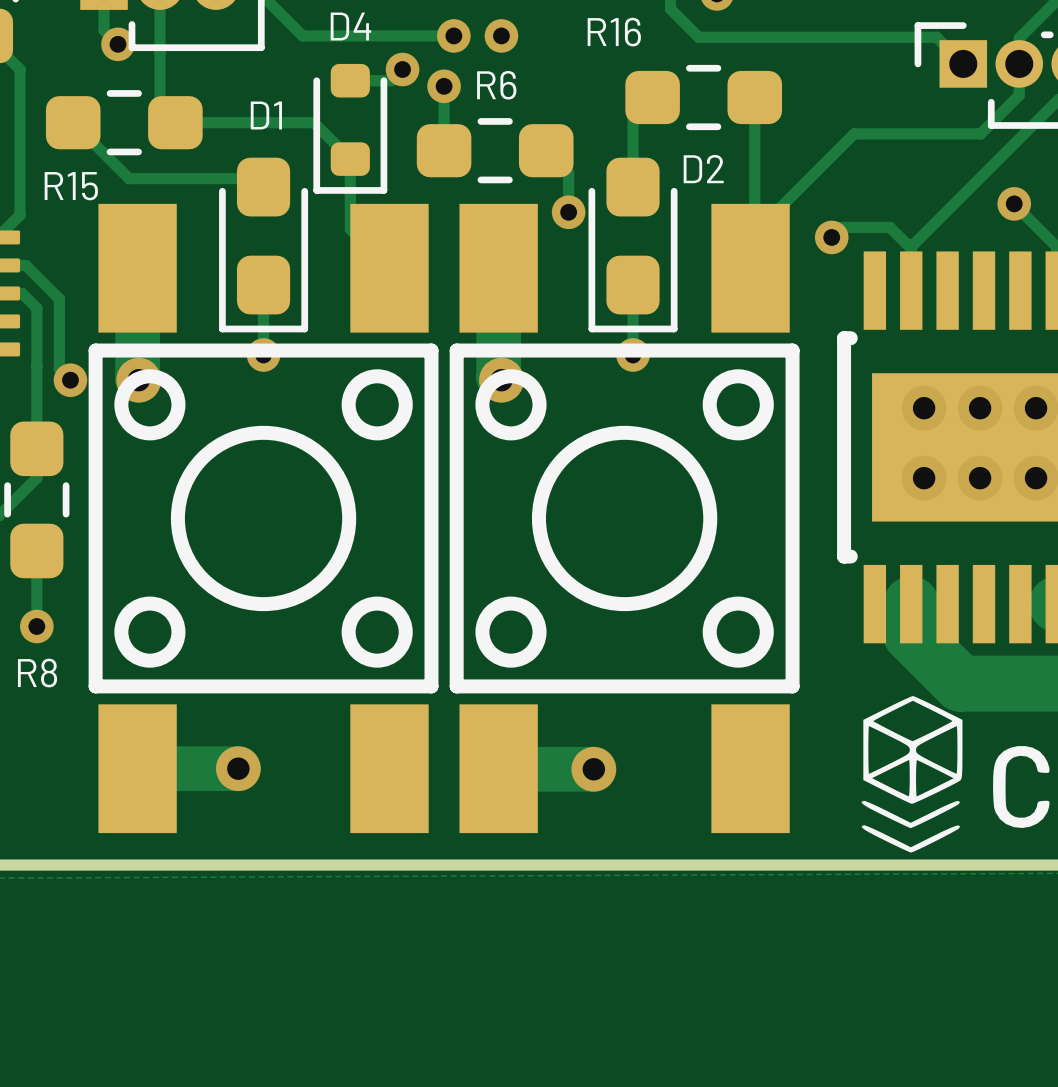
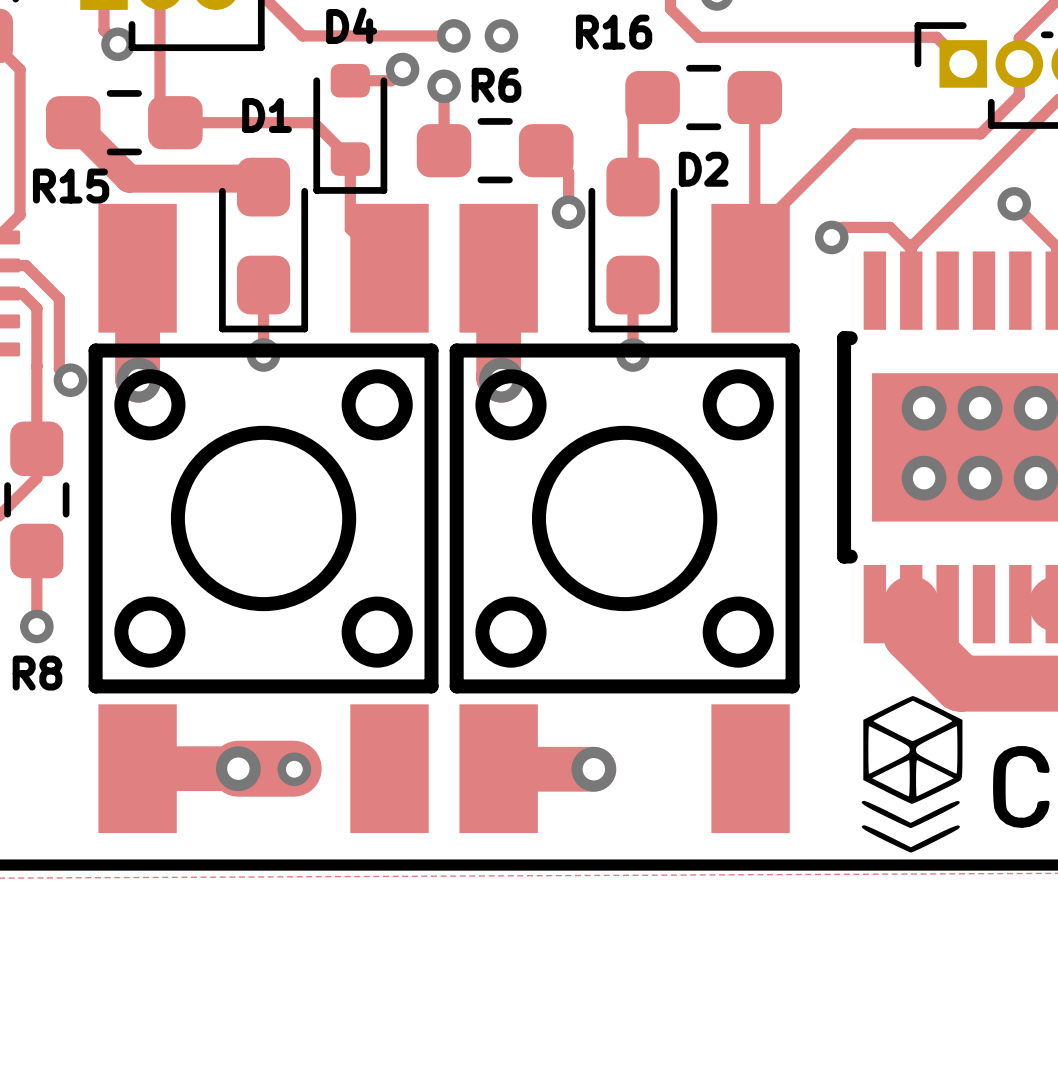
track width: thin (73, 122) (129, 178) (255, 178) (263, 187) -> thick (73, 122) (129, 178) (255, 178) (263, 187)
track: none -> (238, 768) (293, 768)
via: none -> (294, 769)

